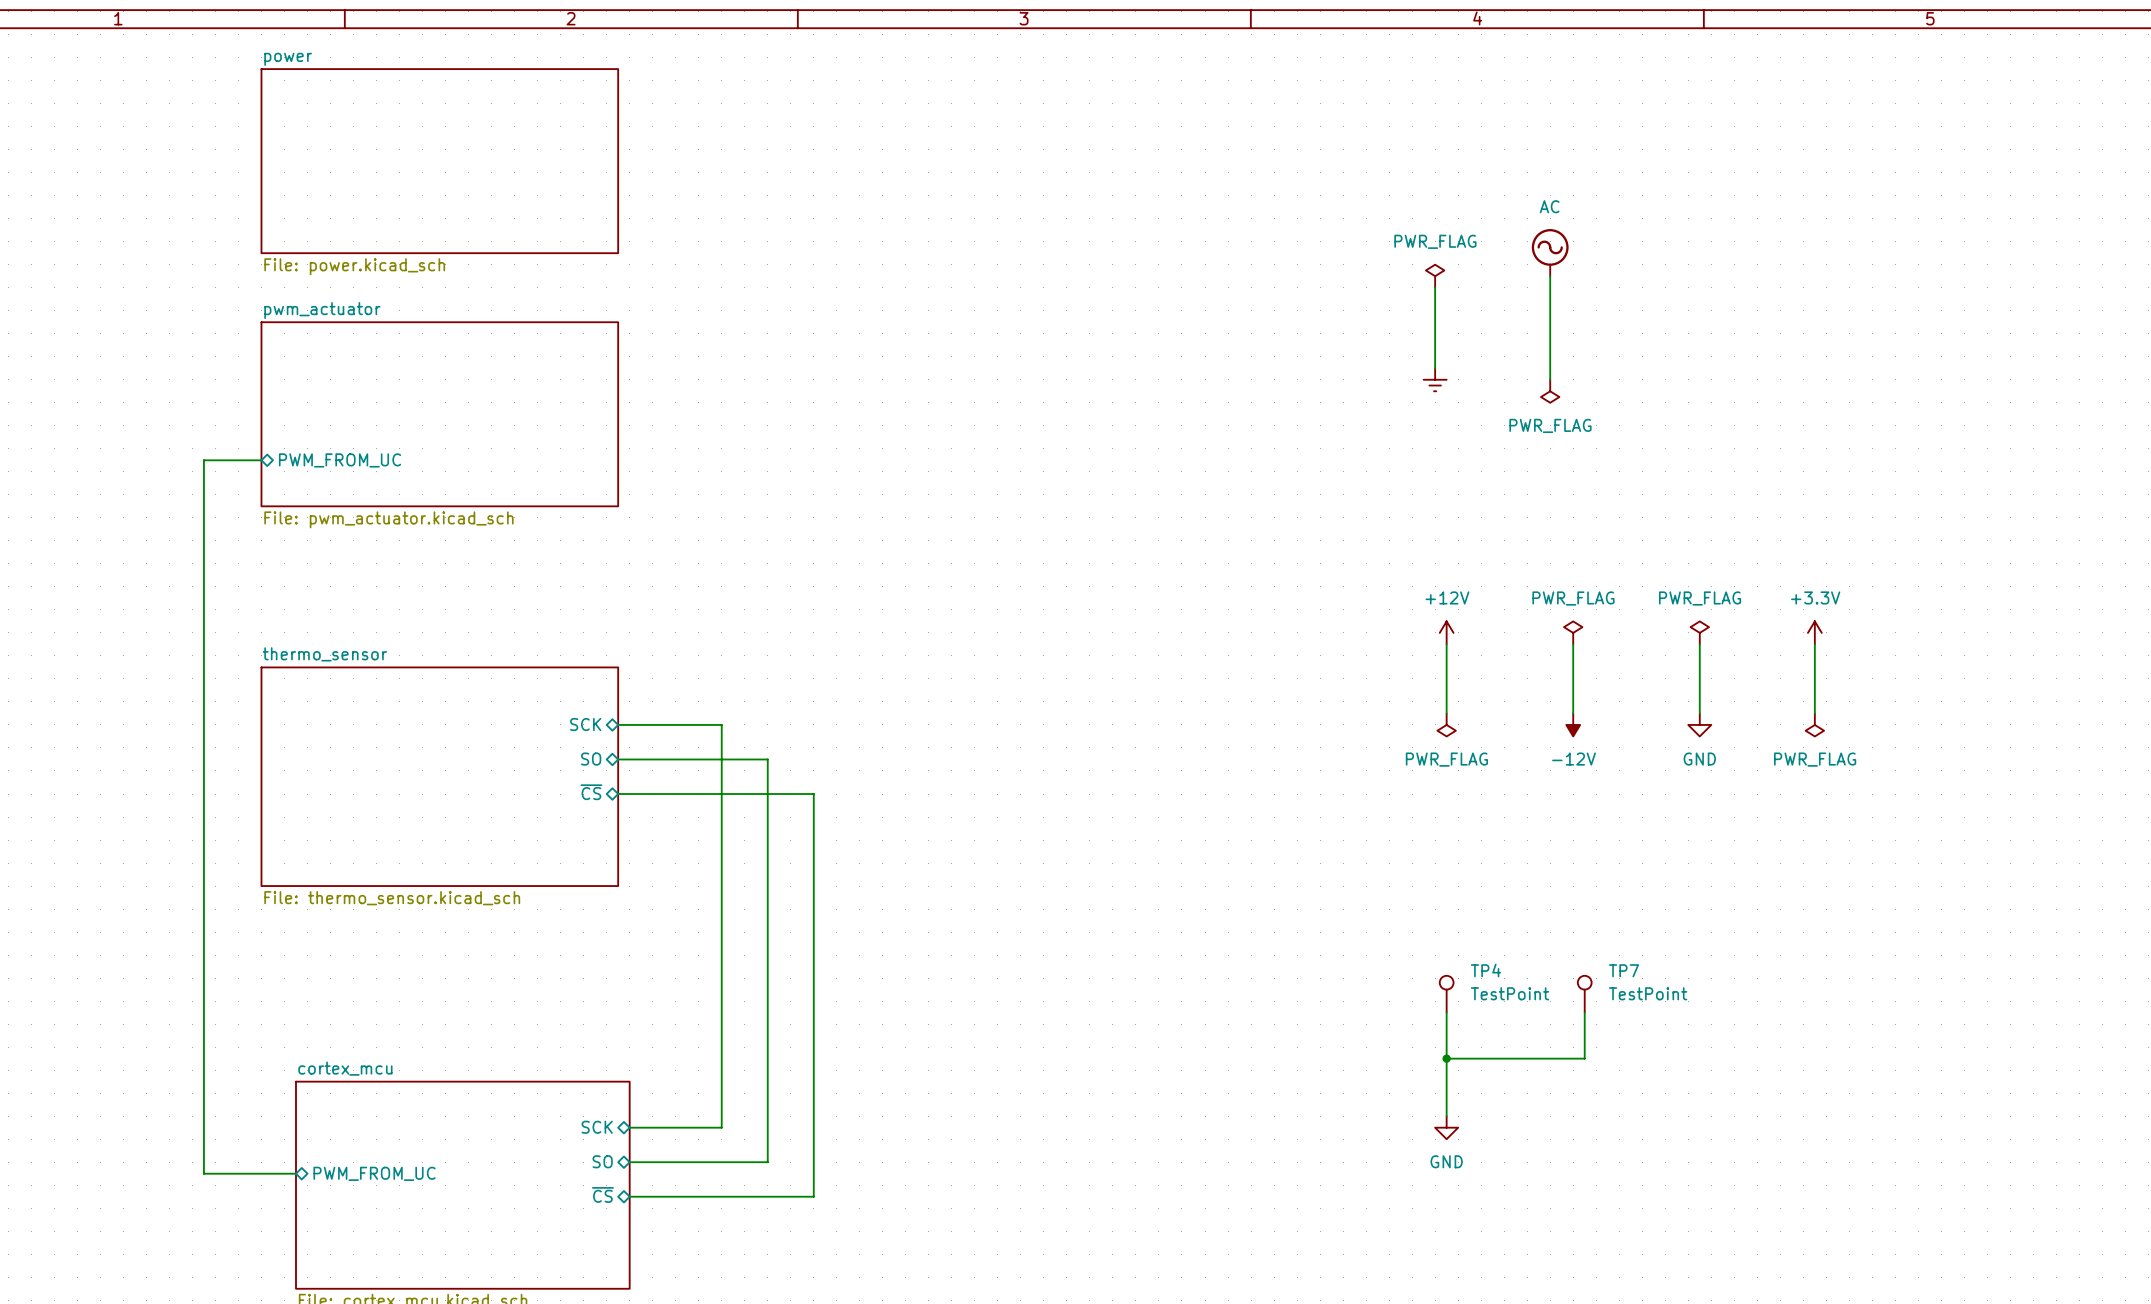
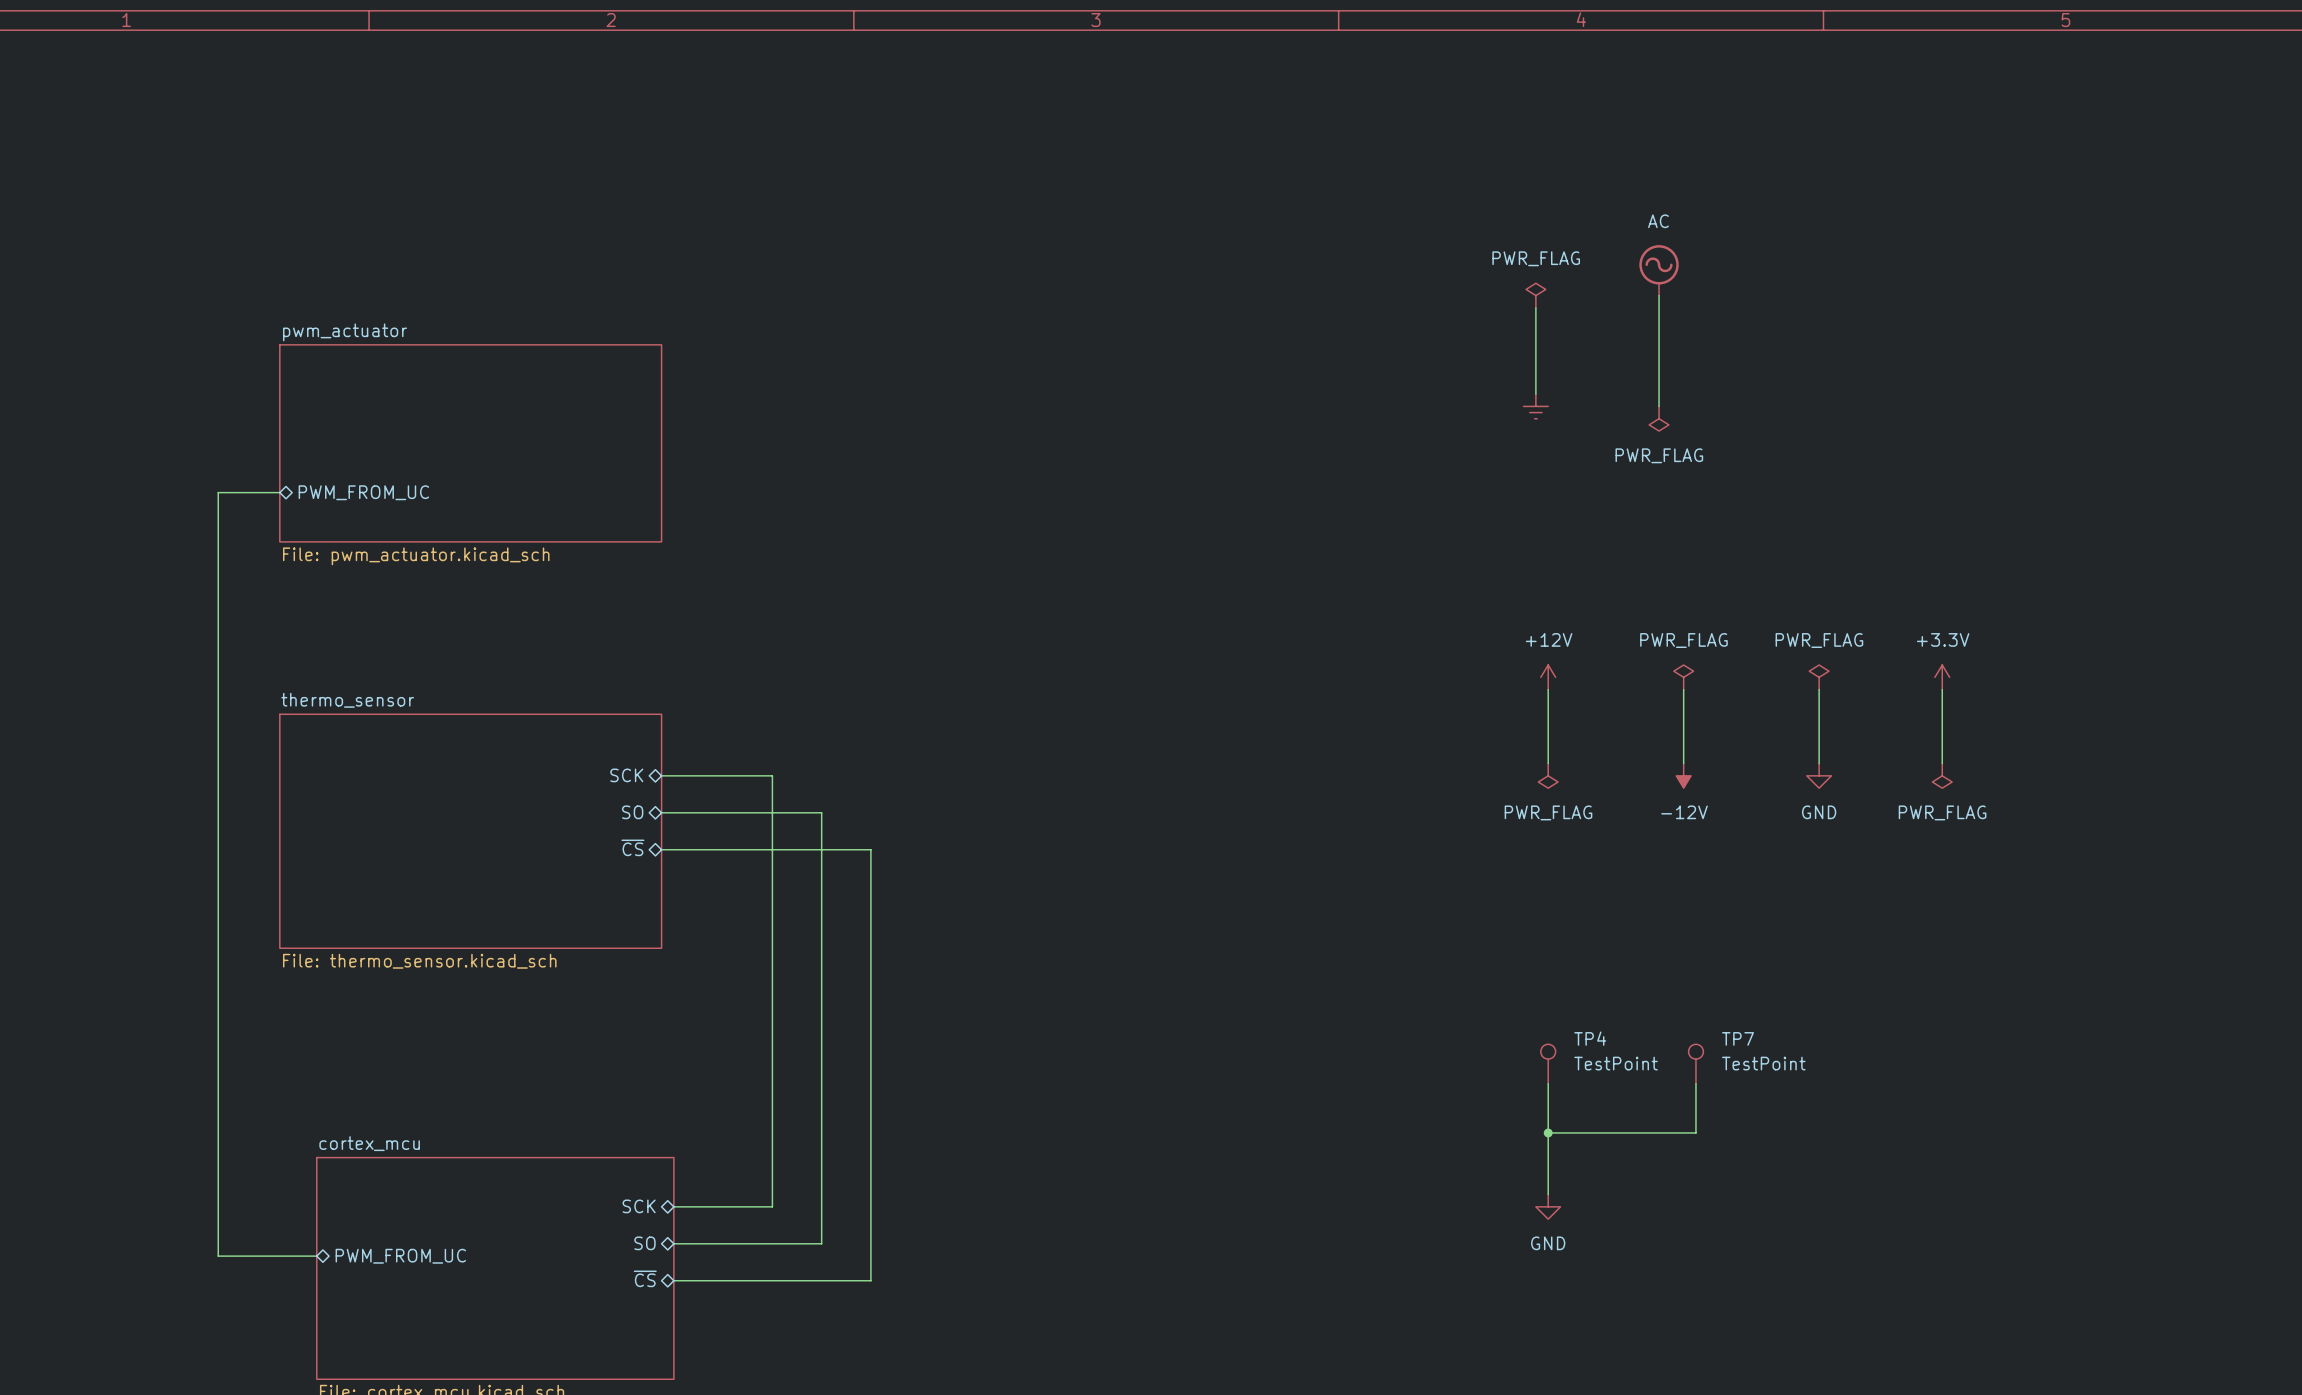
sheet power: File: power.kicad_sch (439, 161) -> none

